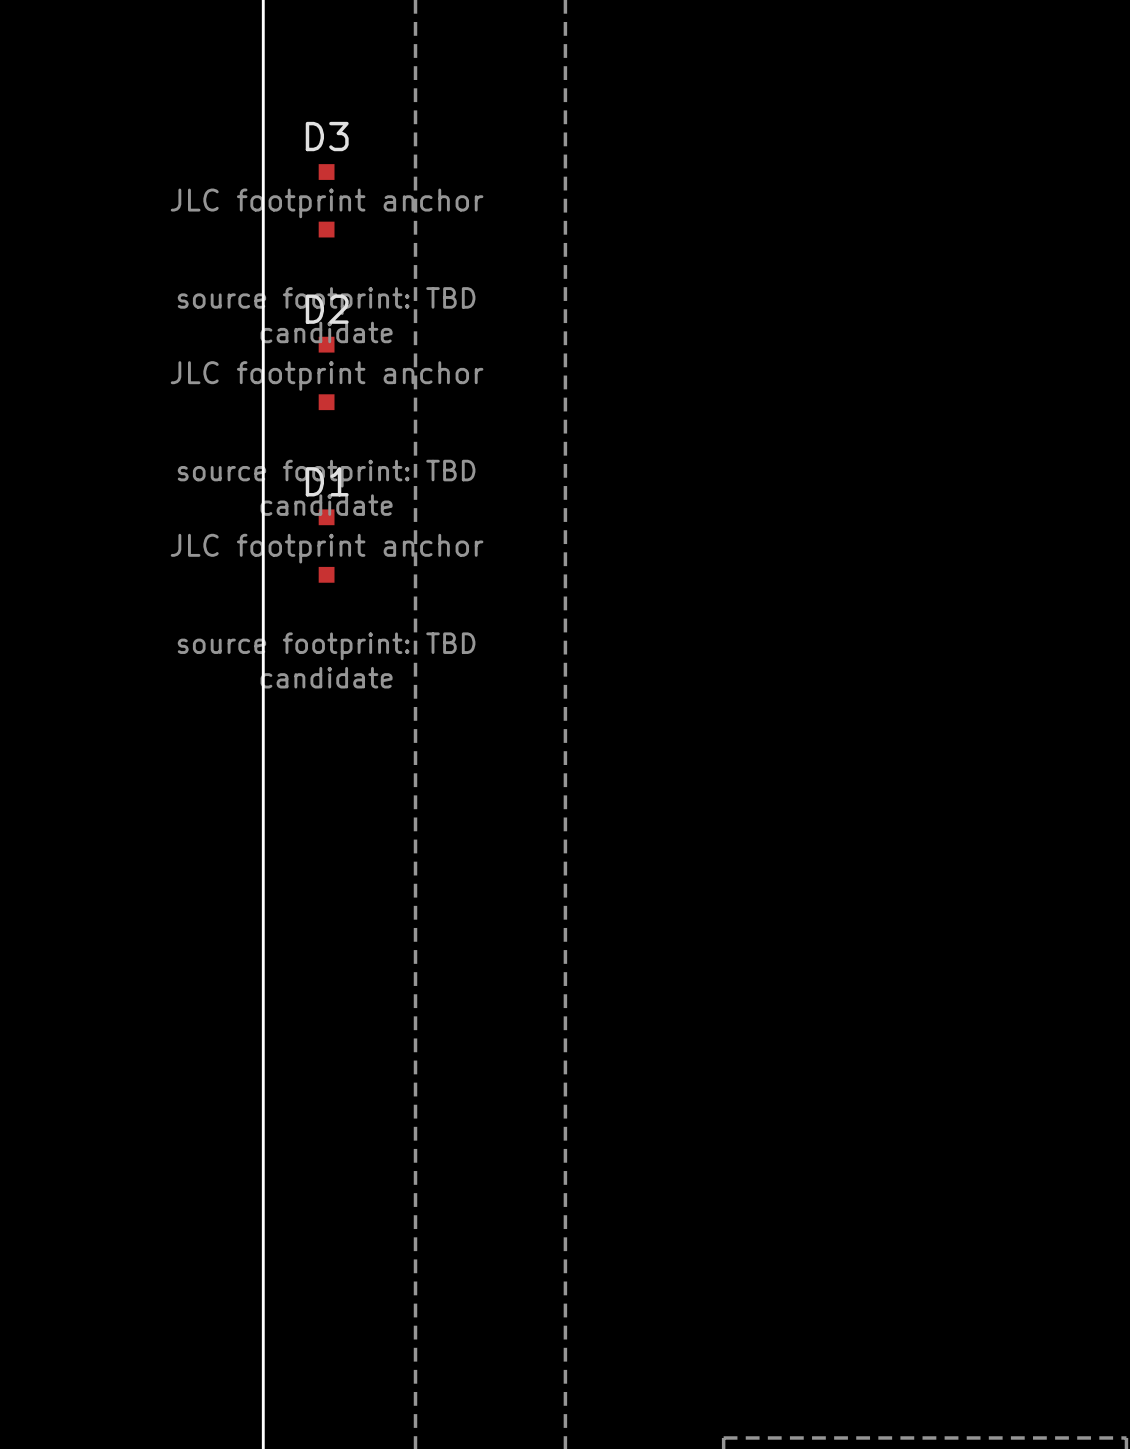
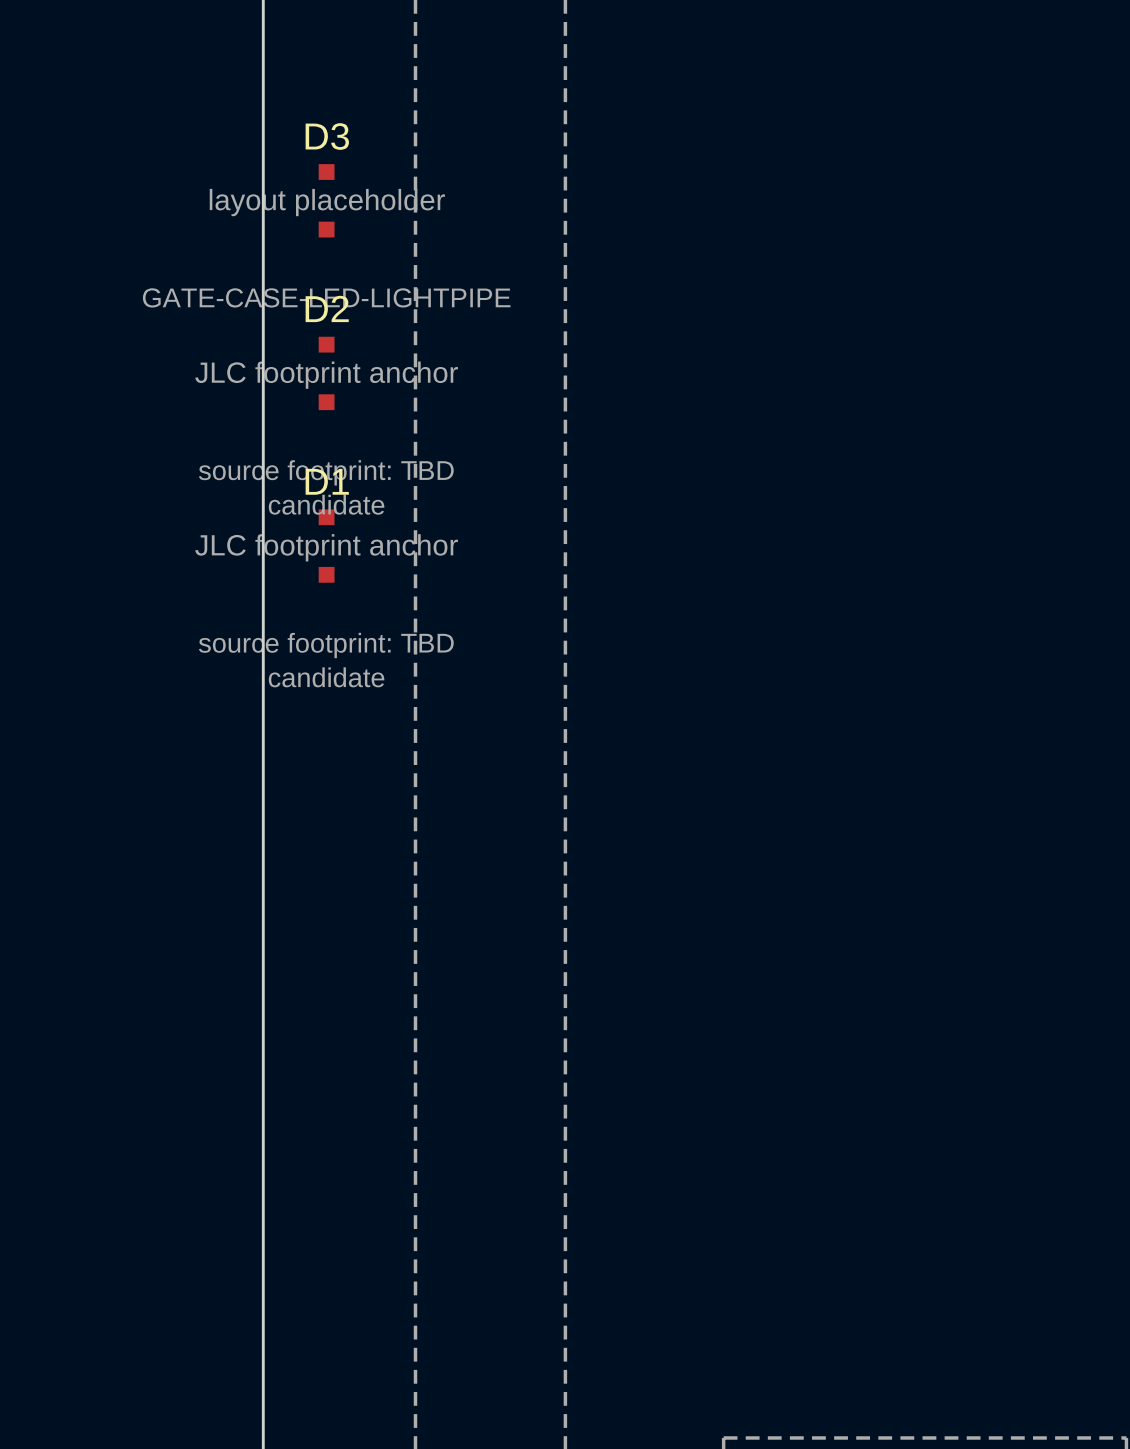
D3 text: JLC footprint anchor (327, 203) -> layout placeholder (327, 202)
D3 text: source footprint: TBD (326, 301) -> GATE-CASE-LED-LIGHTPIPE (326, 297)
D3 text: candidate (326, 332) -> none

